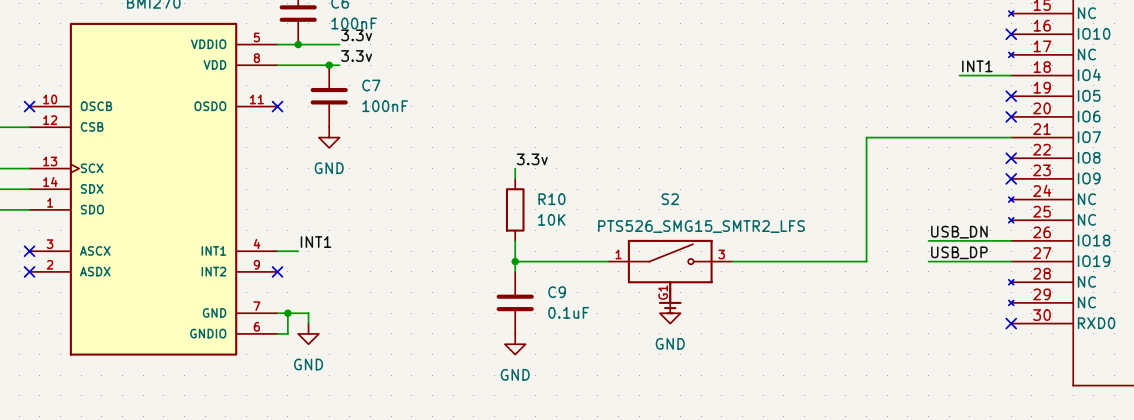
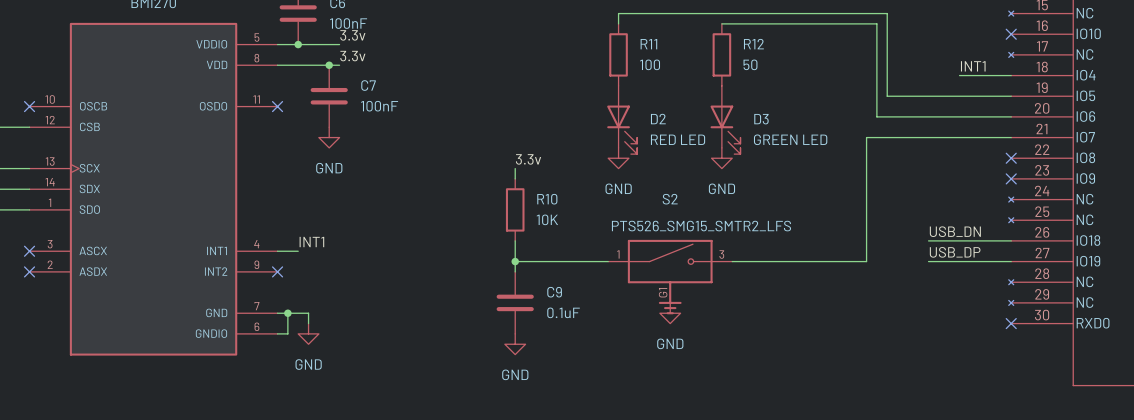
wire: none -> (618, 23) (618, 13) (887, 13) (887, 96) (1011, 96)
wire: none -> (721, 23) (876, 23) (876, 116) (1011, 116)
R11: none -> 100 (618, 54)
R12: none -> 50 (721, 54)
no-connect mark: (1011, 96) -> none
no-connect mark: (1011, 116) -> none
D2: none -> RED LED (622, 120)
D3: none -> GREEN LED (725, 120)
power symbol: none -> GND (618, 158)
power symbol: none -> GND (721, 158)

